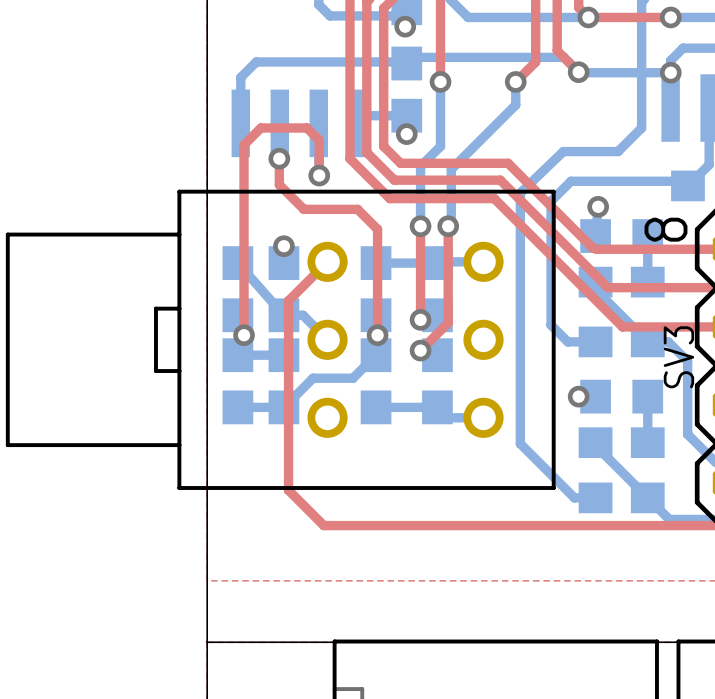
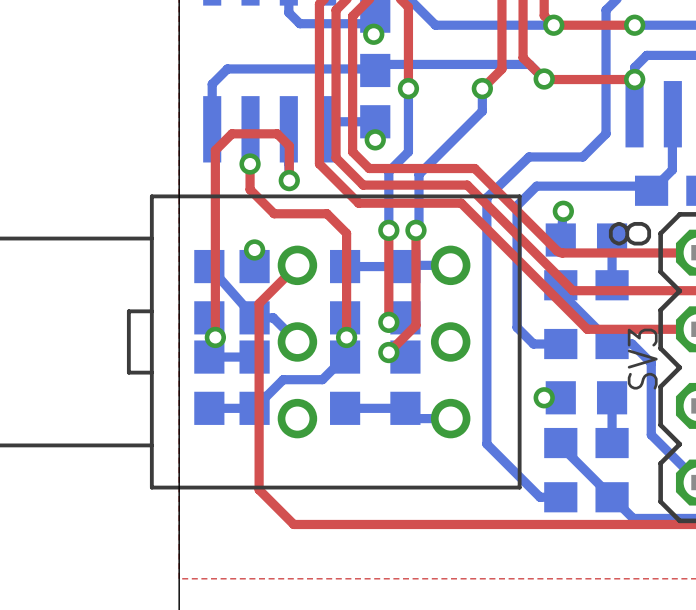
top track: none -> (544, 78) (634, 79)
bottom track: (579, 72) (670, 72) -> none

